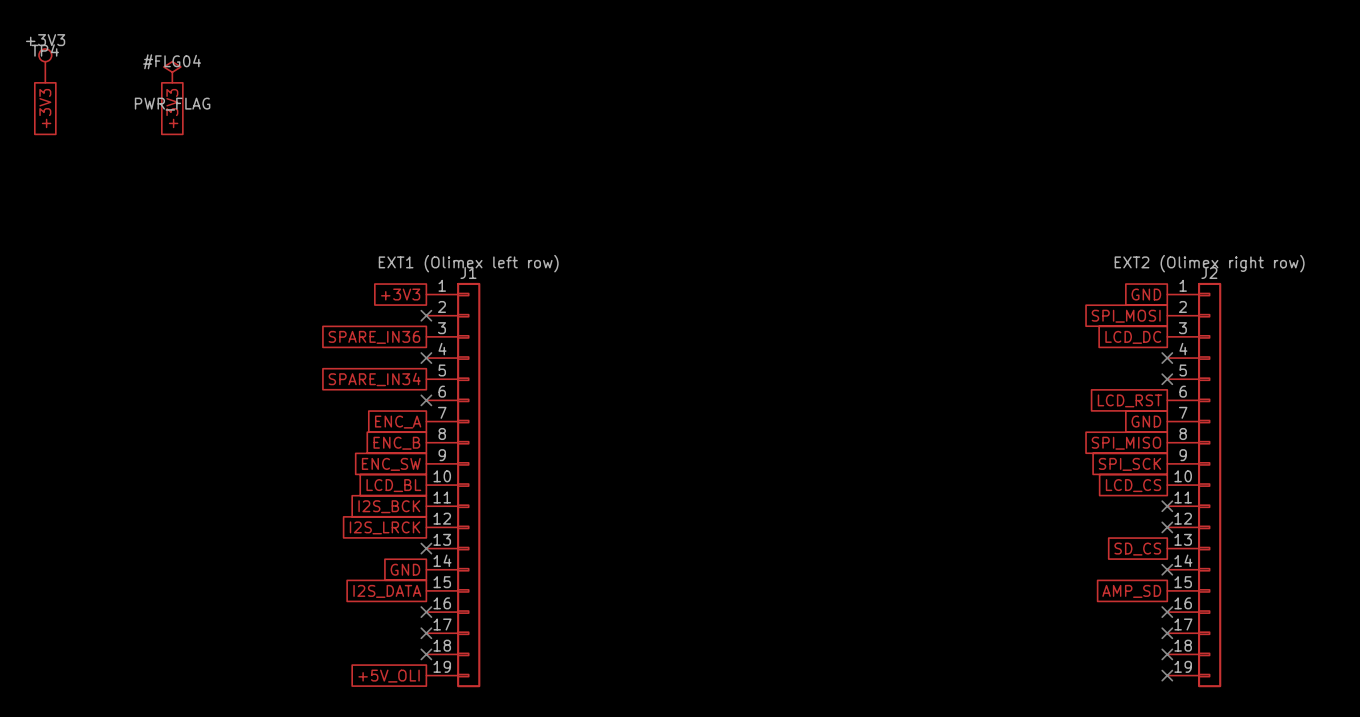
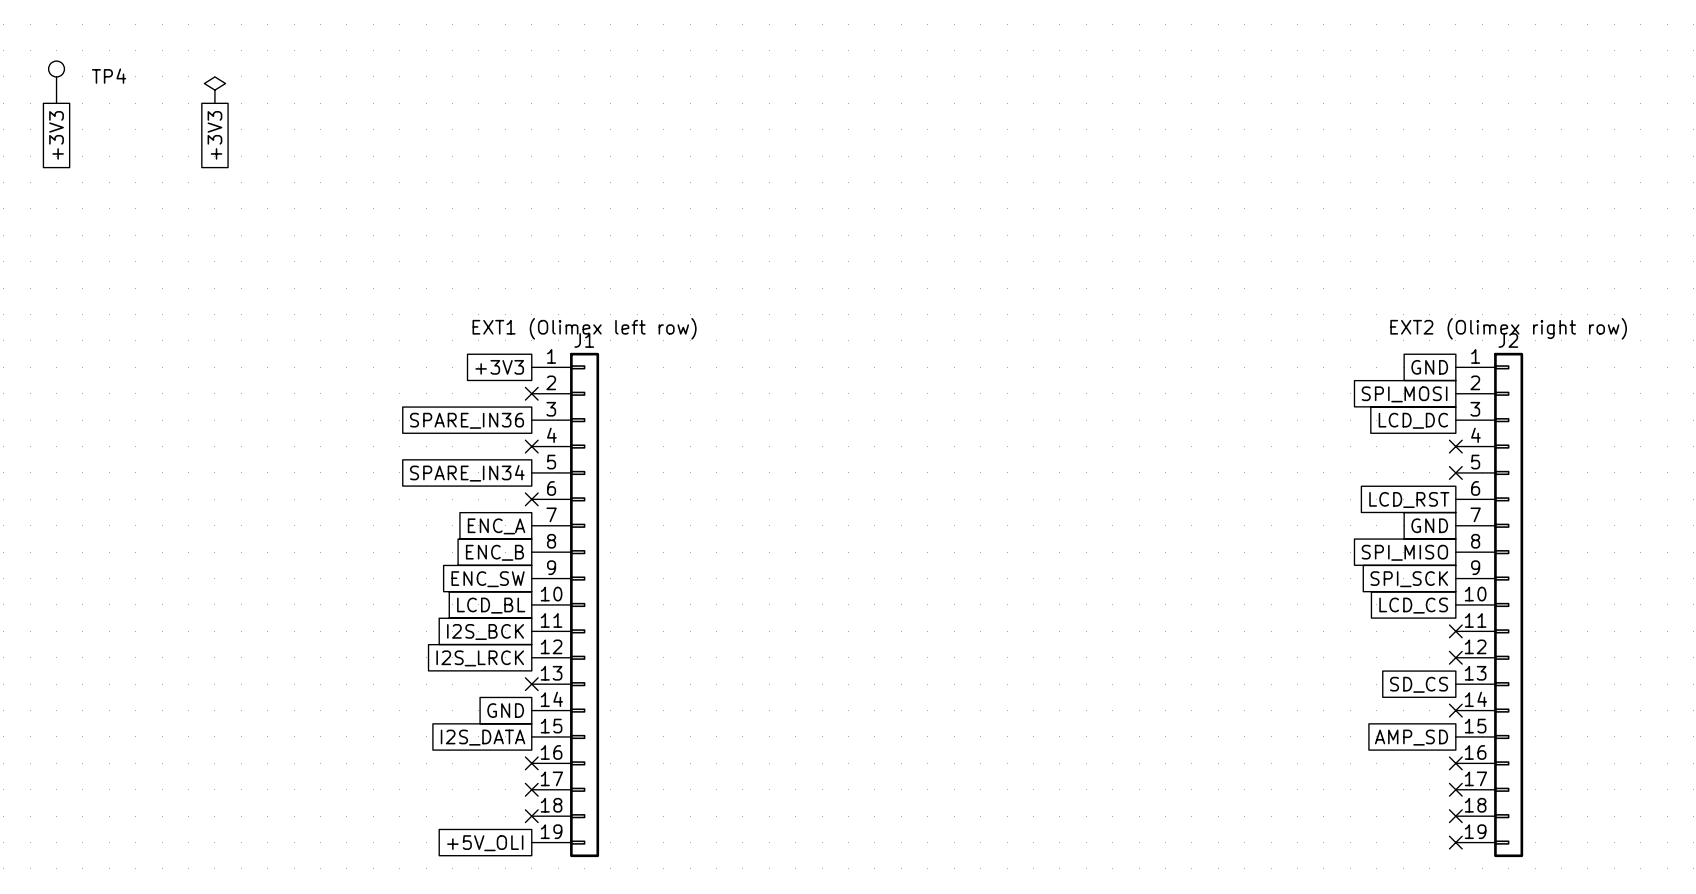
TP4 value: +3V3 (45, 40) -> none
TP4 name position: TP4 (45, 50) -> TP4 (109, 76)
#FLG04 name: #FLG04 (172, 61) -> none
#FLG04 text: PWR_FLAG (172, 104) -> none

